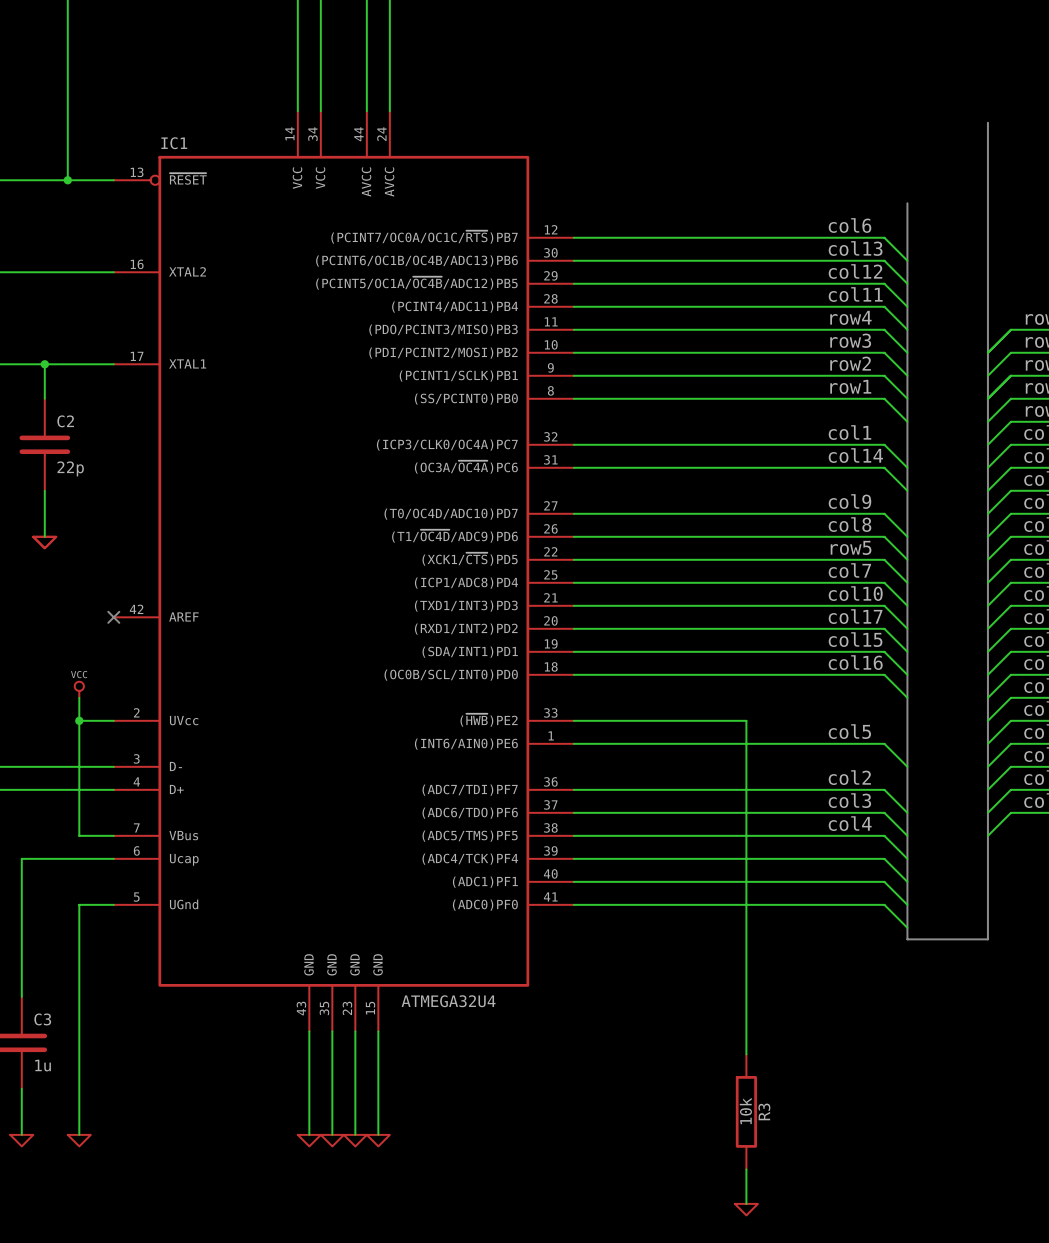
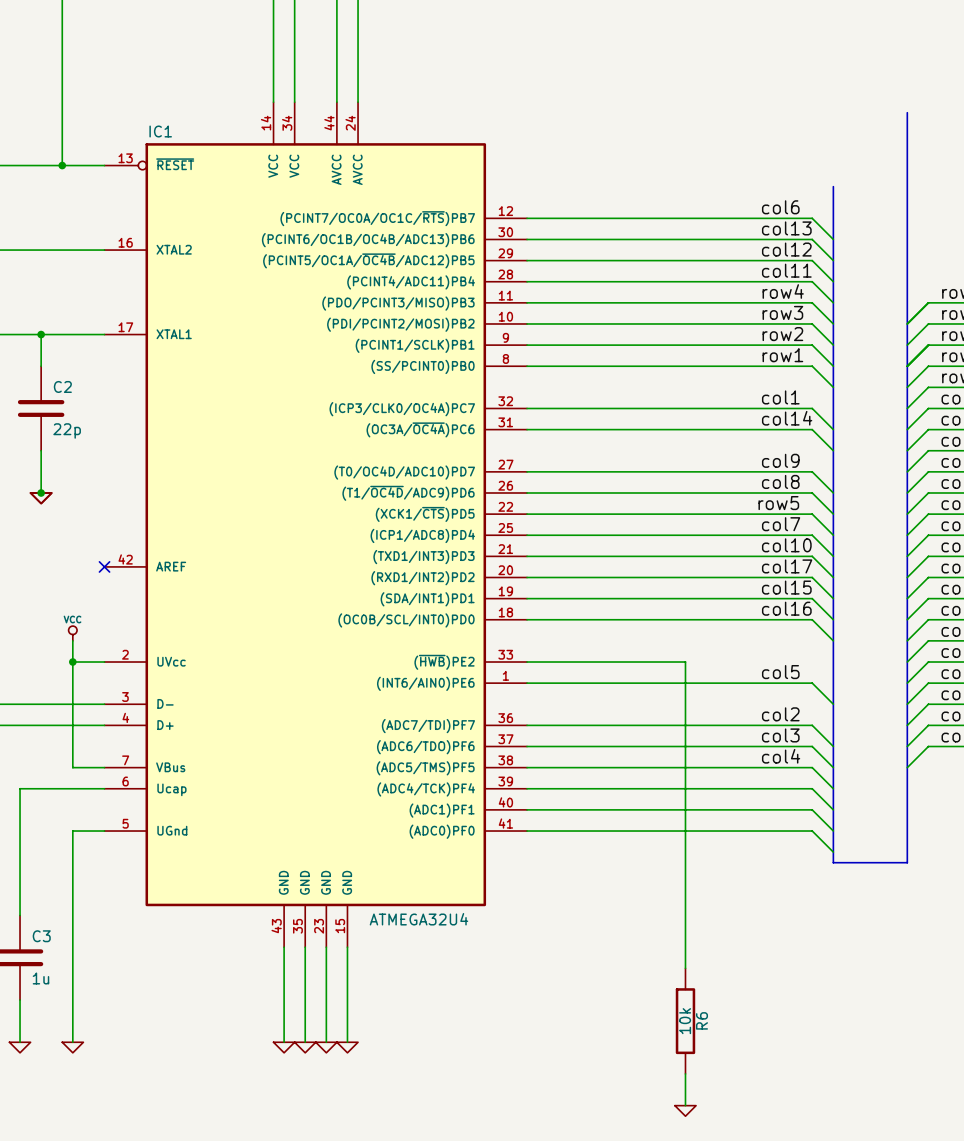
junction: none -> (41, 492)
R3 name: R3 (764, 1111) -> R6 (701, 1020)

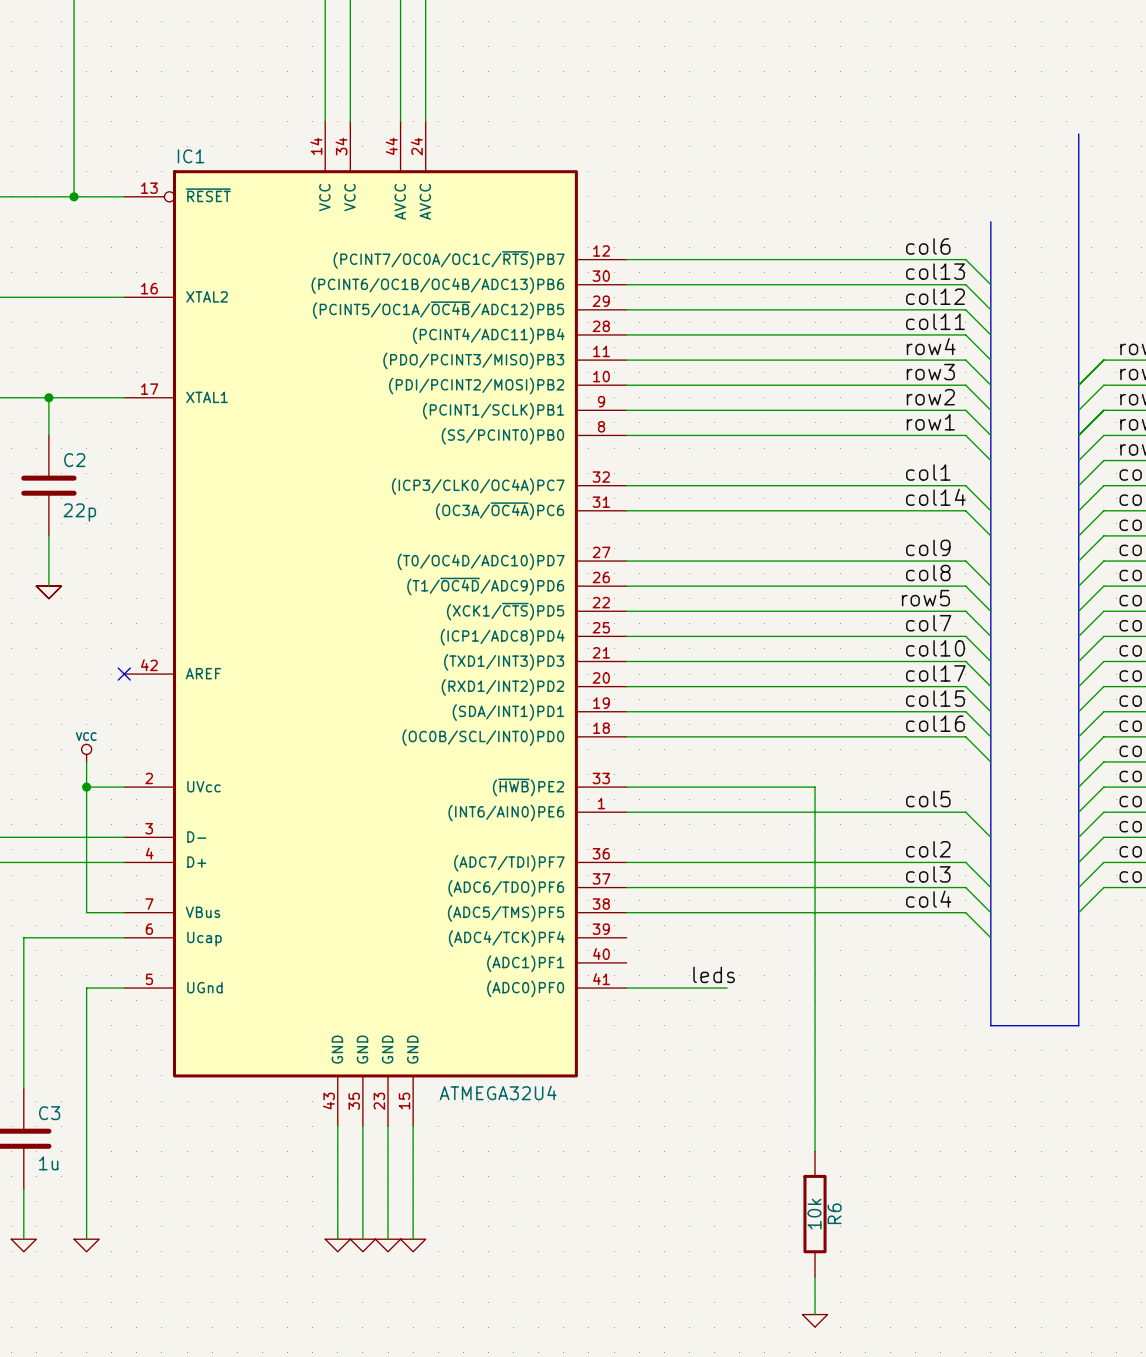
junction: (41, 492) -> none
wire: (527, 788) (812, 788) (833, 809) -> none
wire: (527, 809) (812, 809) (833, 831) -> none
label: none -> leds (714, 974)
wire: (611, 831) (812, 831) (833, 852) -> none

